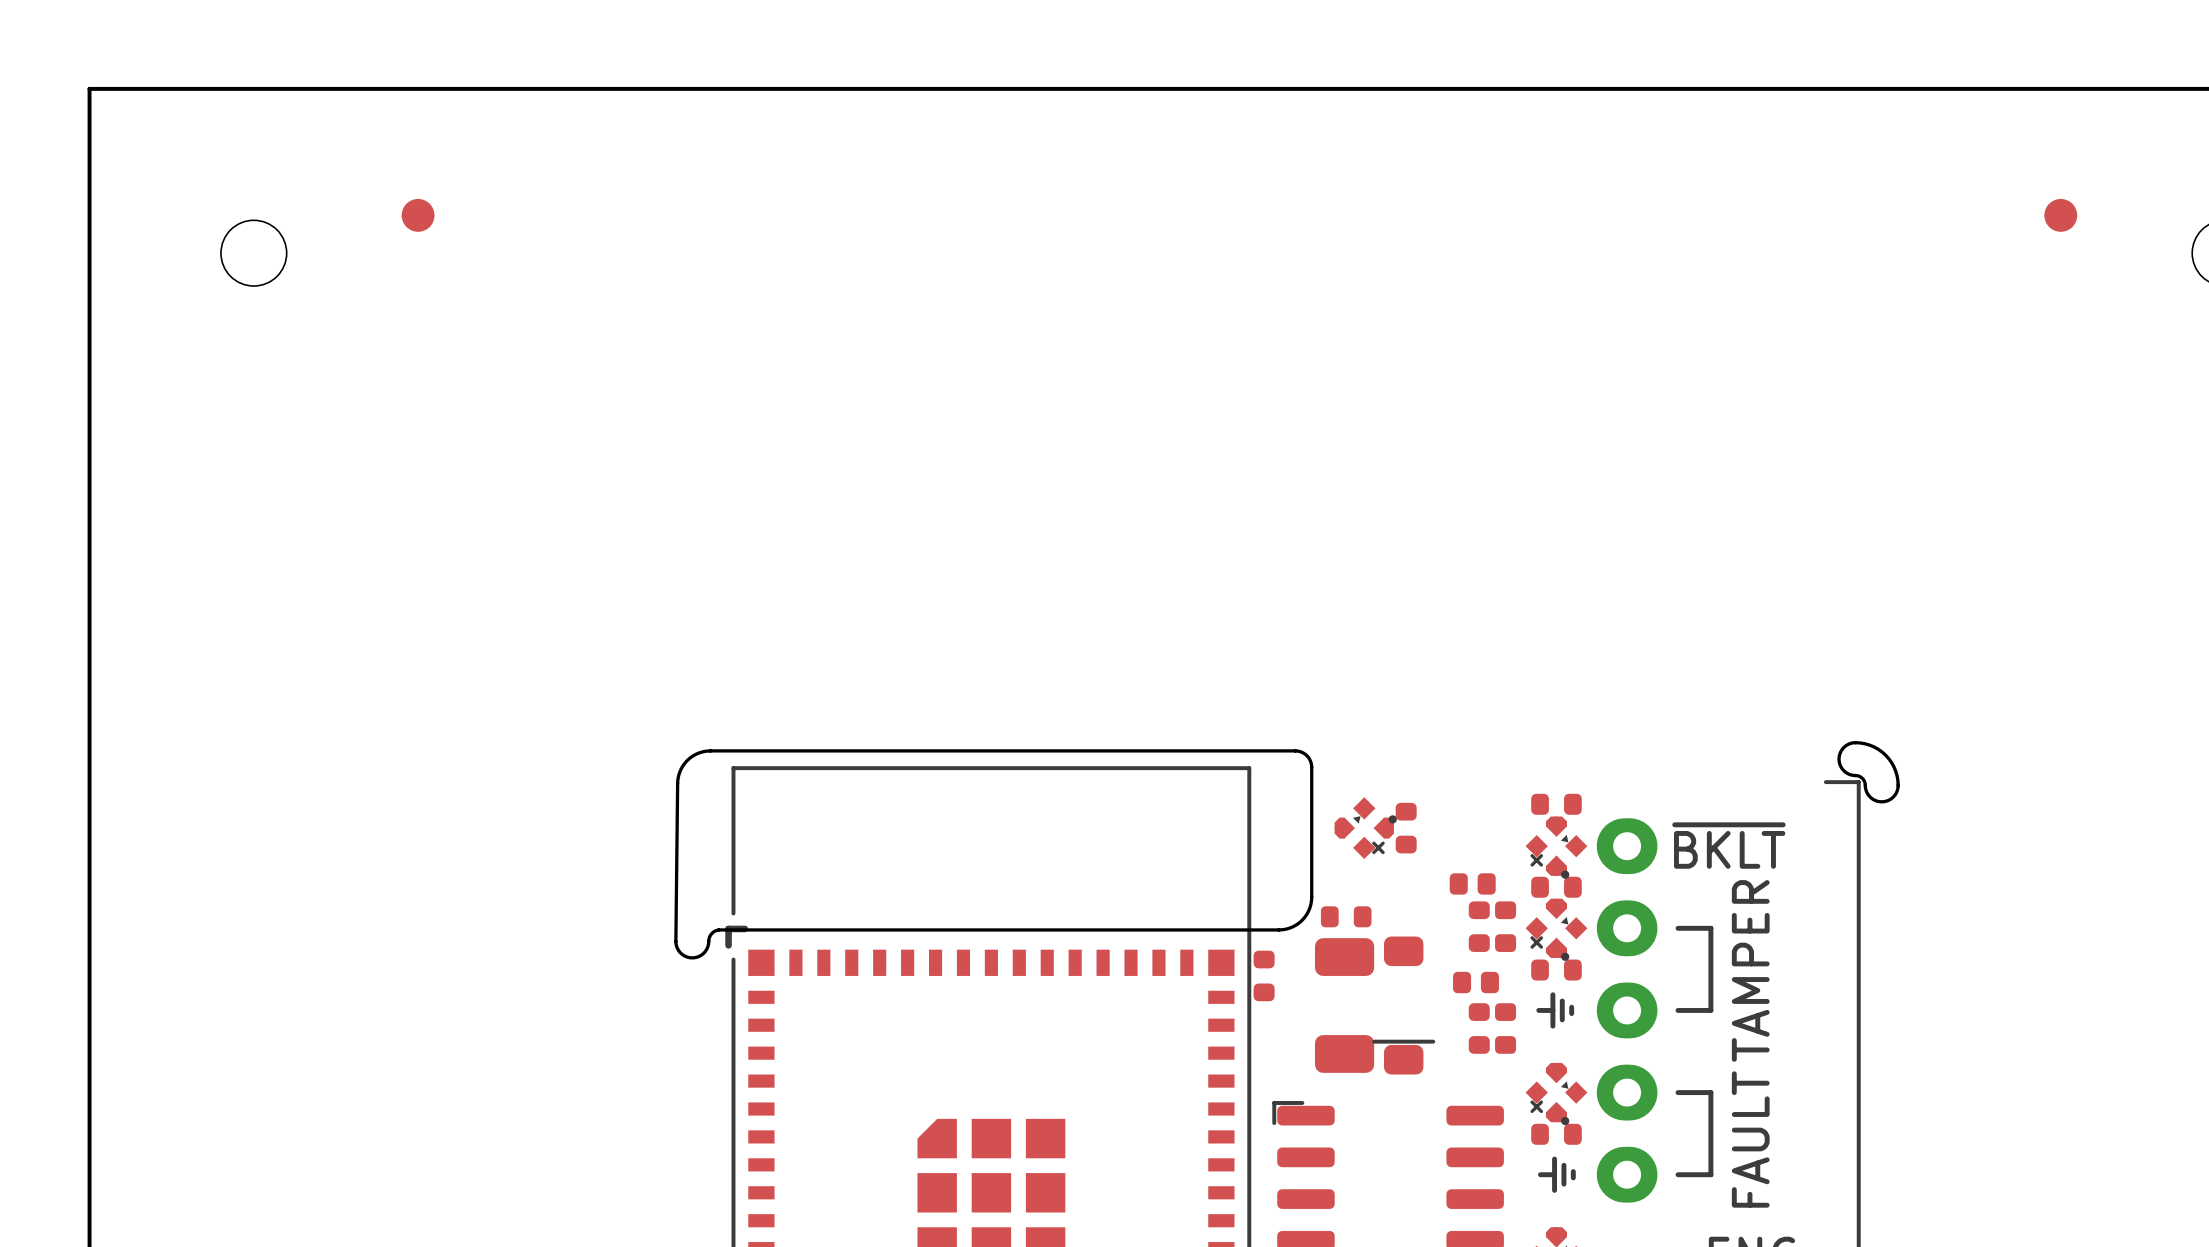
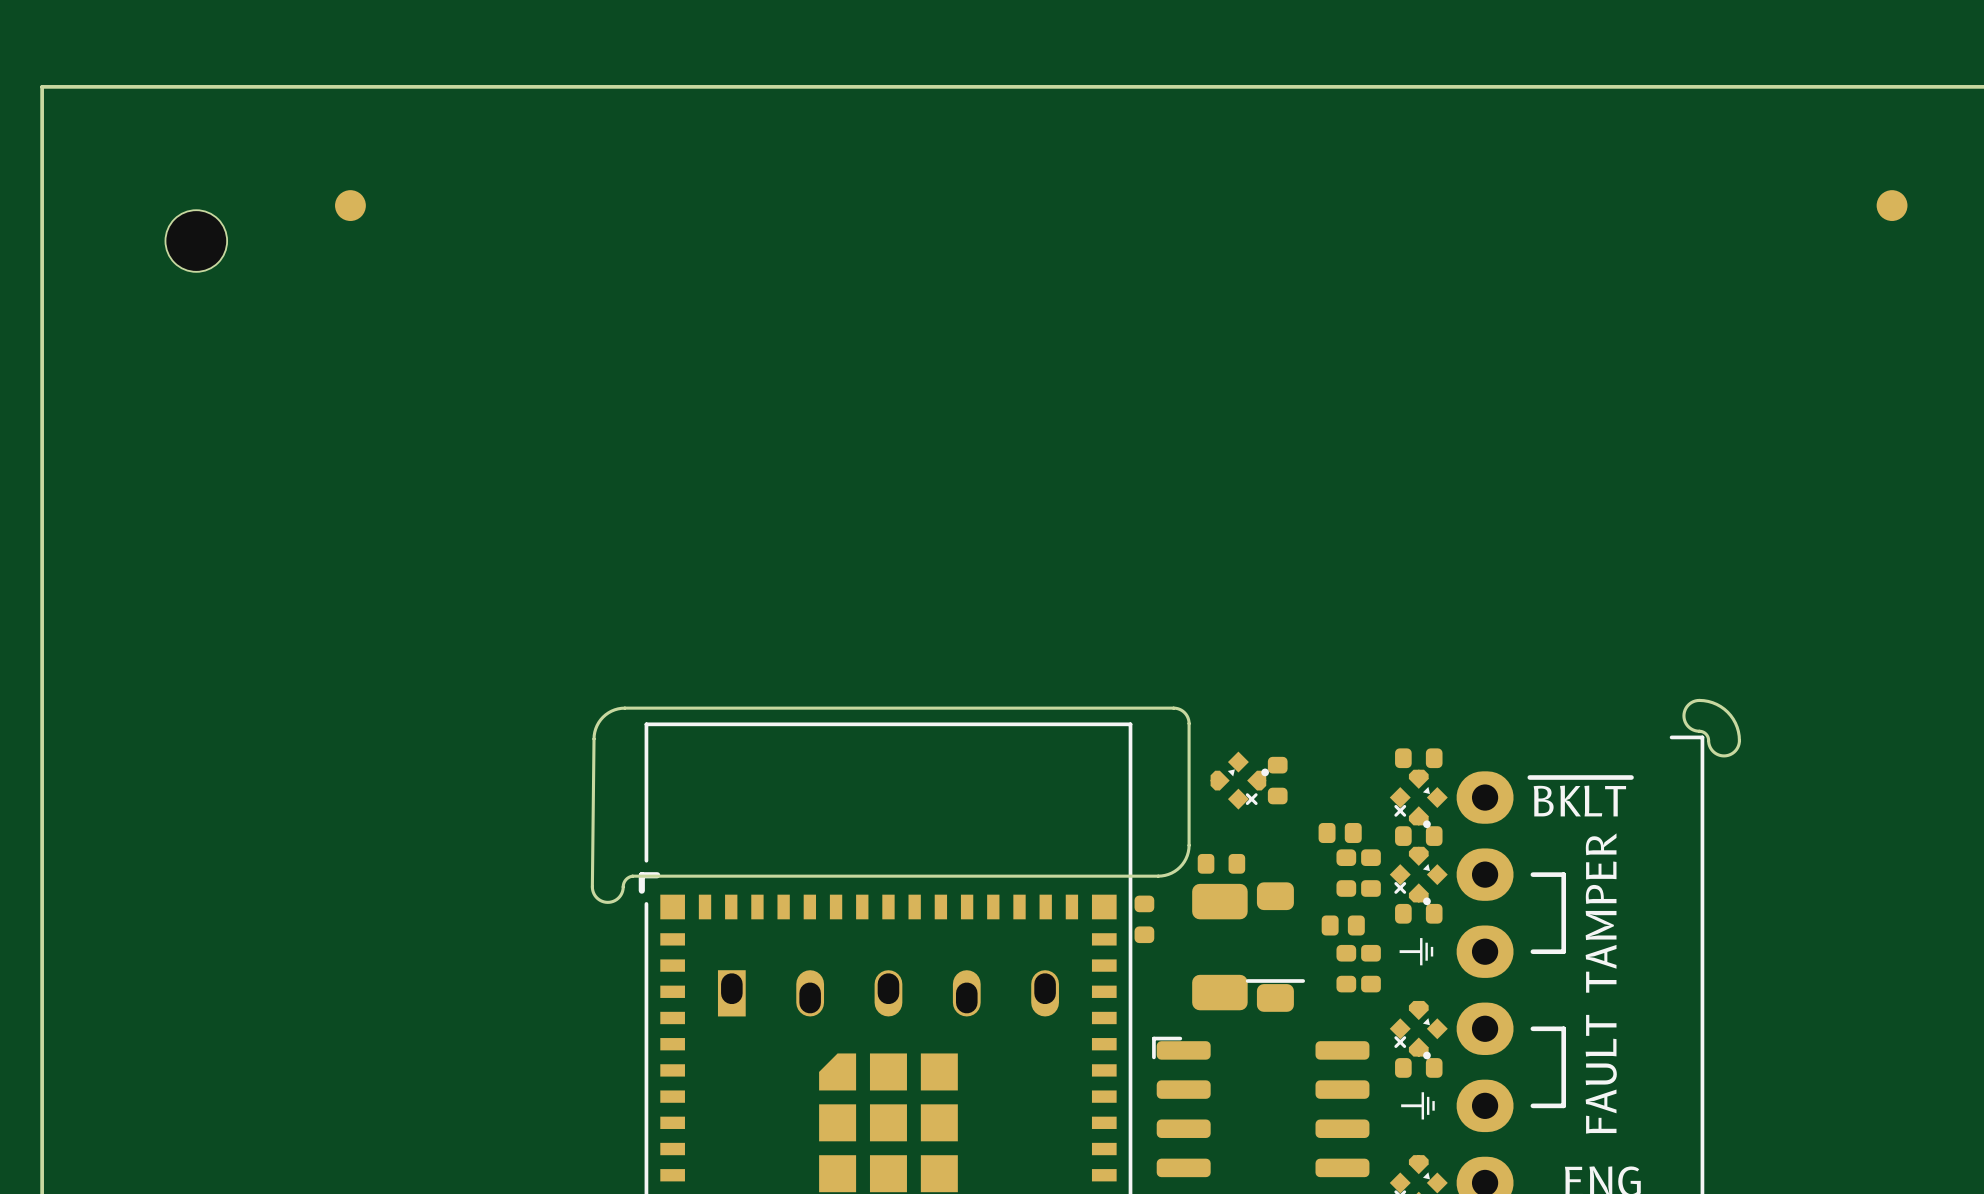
part: none -> (888, 993)

